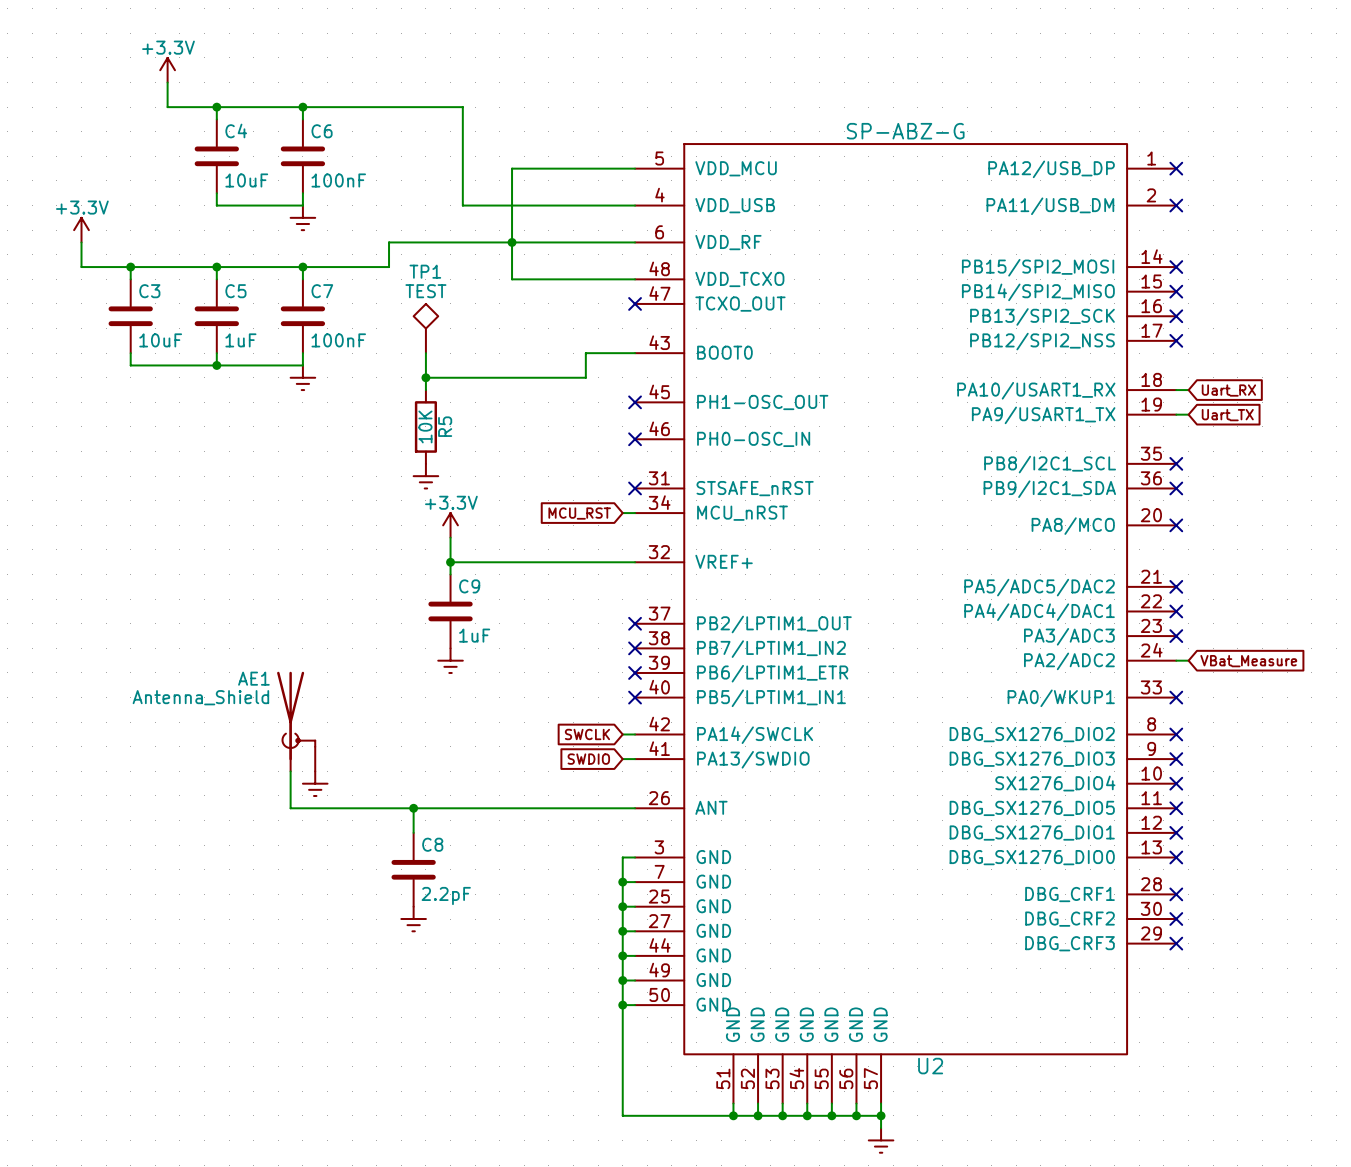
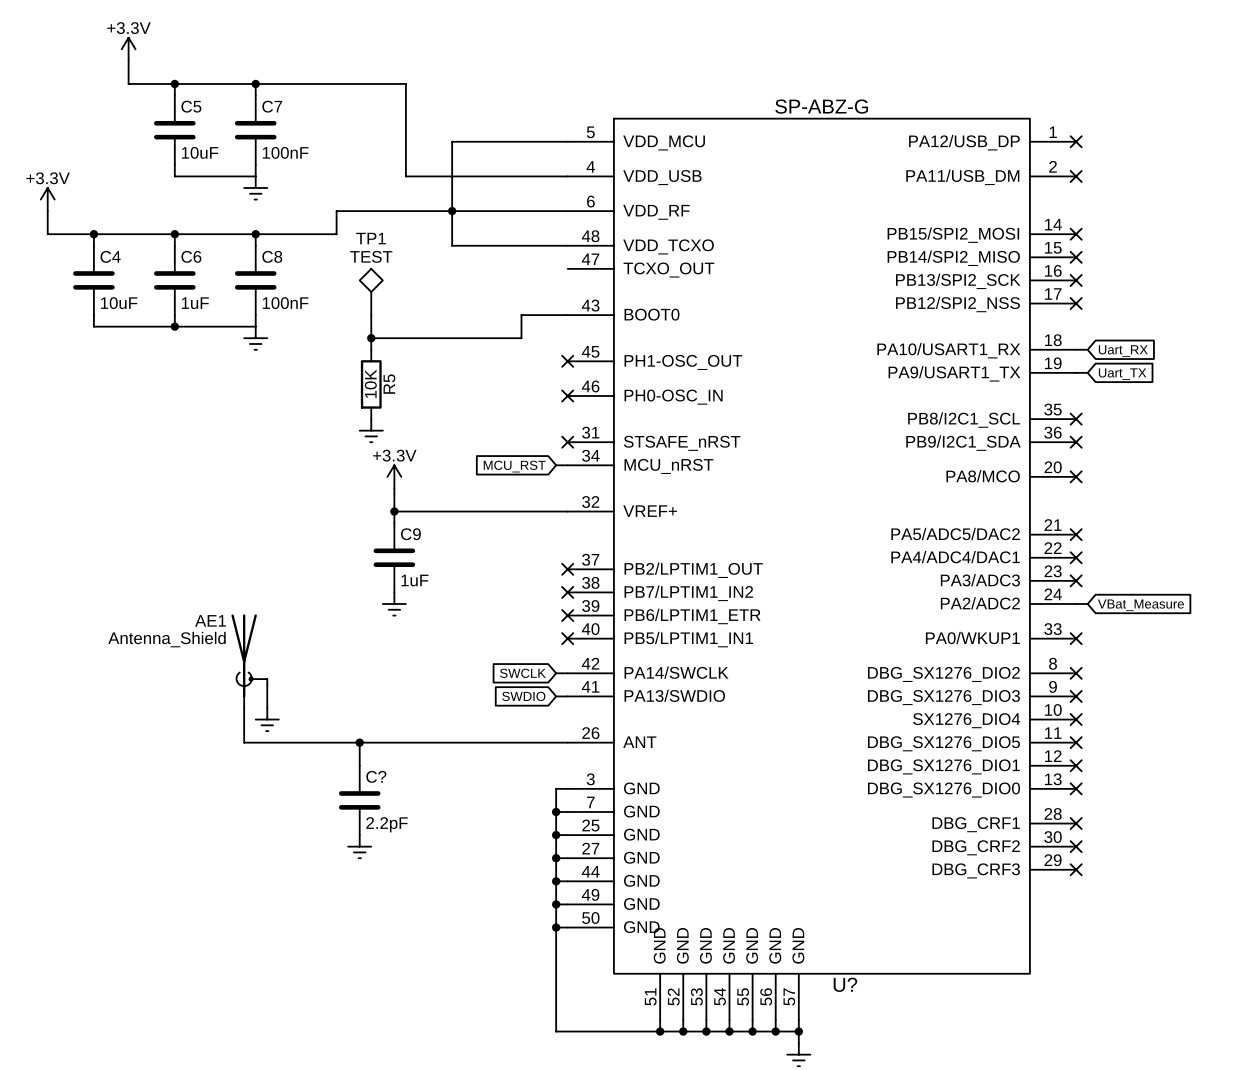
C4 name: C4 (236, 130) -> C5 (191, 106)
C6 name: C6 (322, 131) -> C7 (272, 106)
C3 name: C3 (149, 291) -> C4 (110, 256)
C5 name: C5 (235, 291) -> C6 (191, 256)
C7 name: C7 (322, 291) -> C8 (272, 256)
no-connect mark: (635, 303) -> none
C8 name: C8 (432, 844) -> C? (376, 776)
U2 name: U2 (930, 1066) -> U? (845, 984)

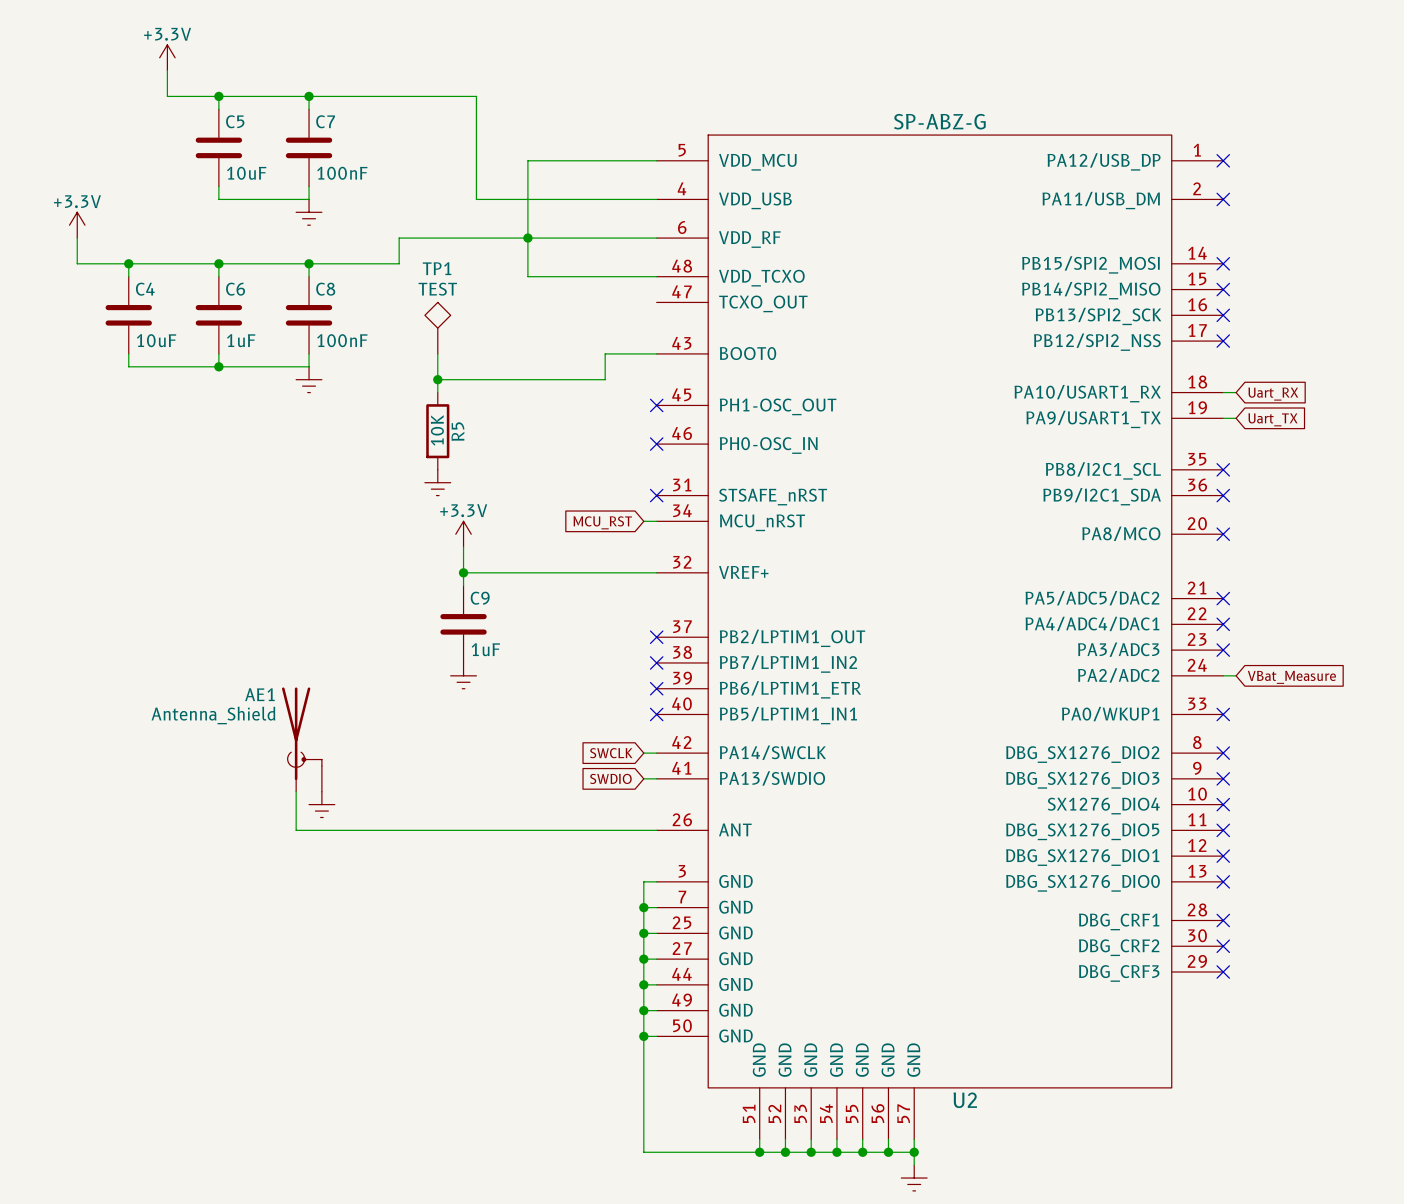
wire: (359, 742) (359, 765) -> none
junction: (359, 742) -> none
C?: 2.2pF (359, 800) -> none
power symbol: (359, 846) -> none
U? name: U? (845, 984) -> U2 (965, 1100)

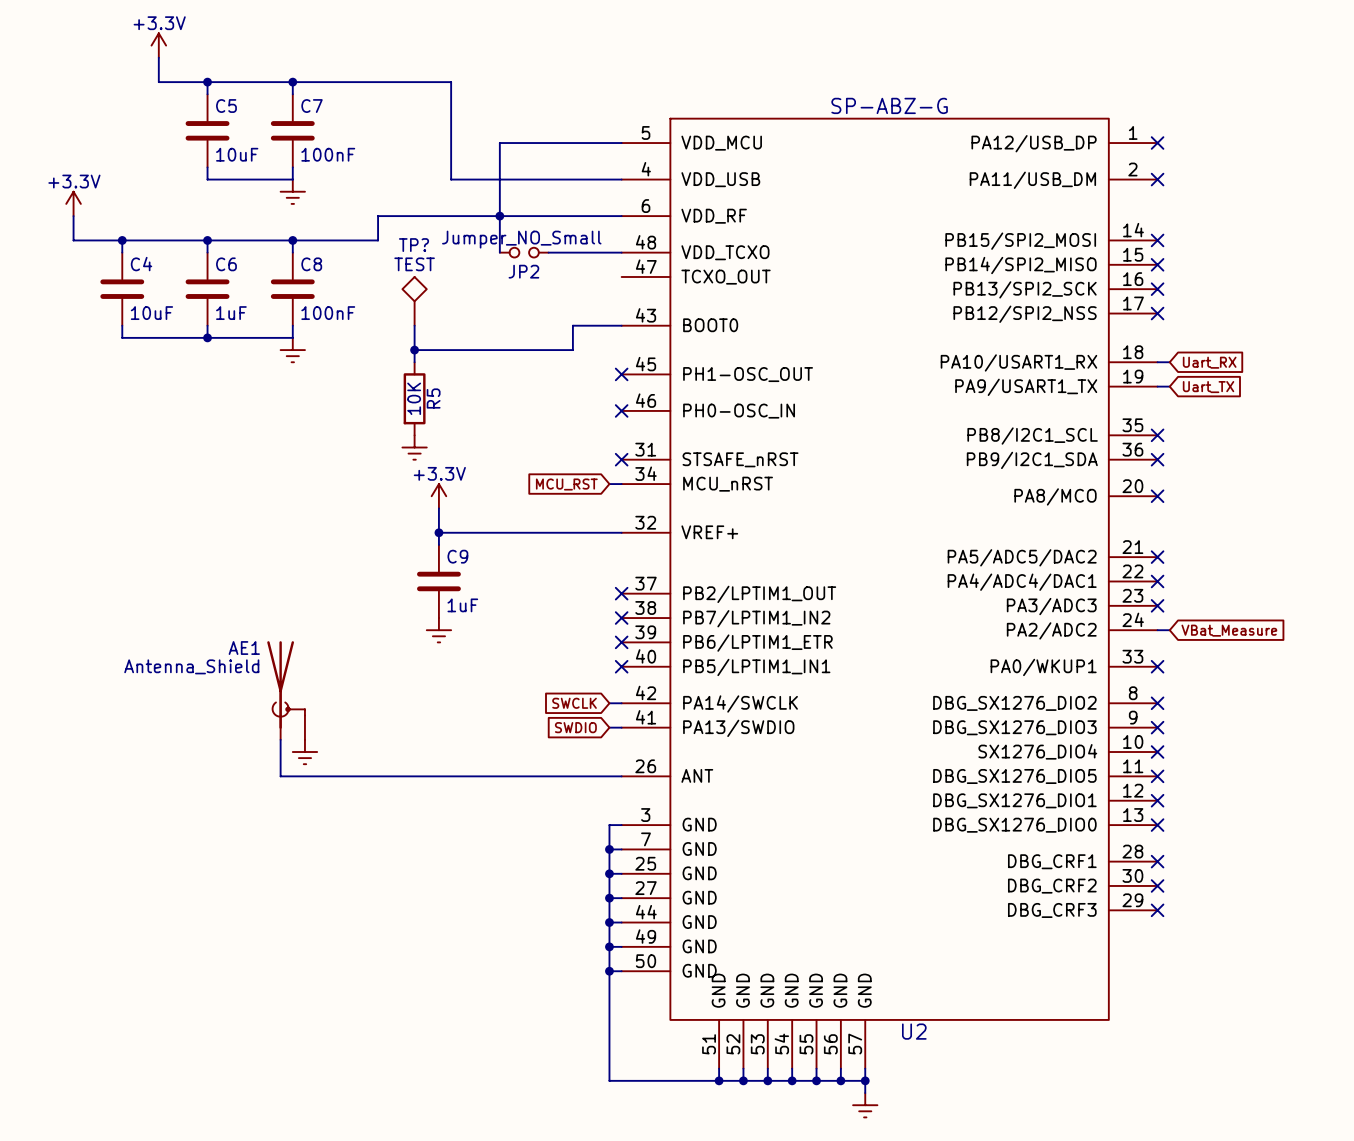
TP1 name: TP1 (437, 268) -> TP? (414, 245)
wire: (527, 276) (579, 276) -> none
JP2: none -> Jumper_NO_Small (524, 252)

